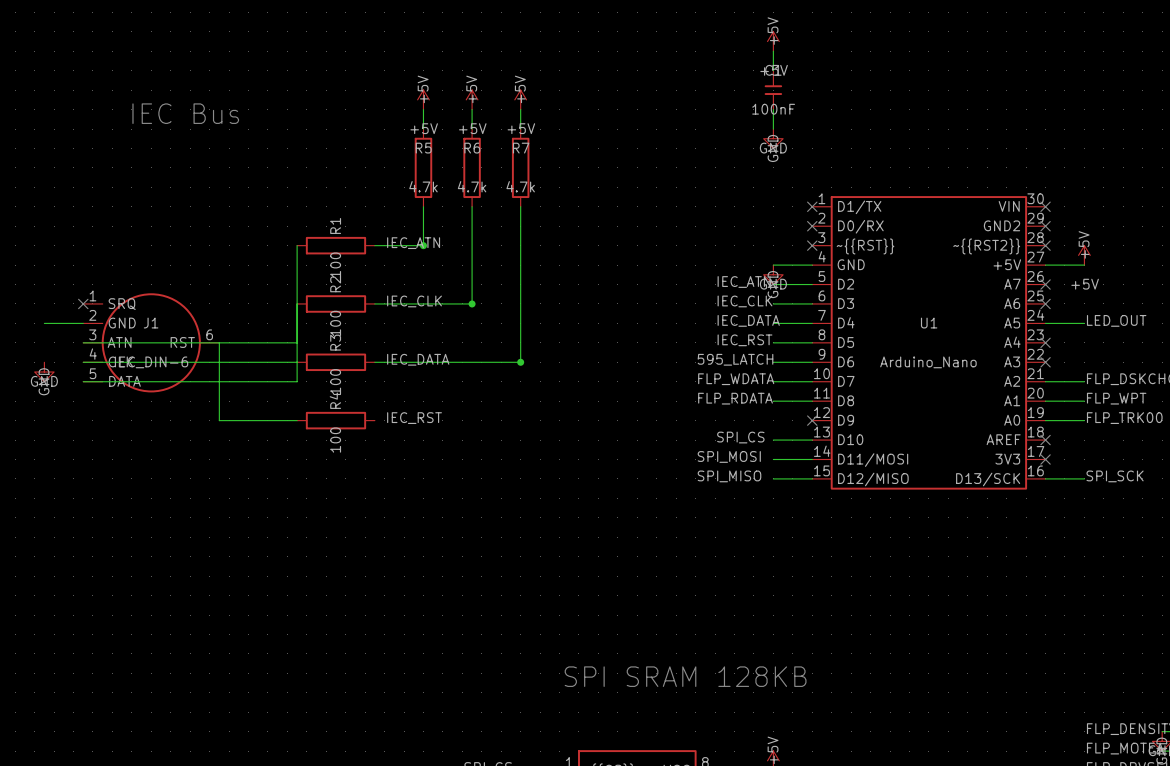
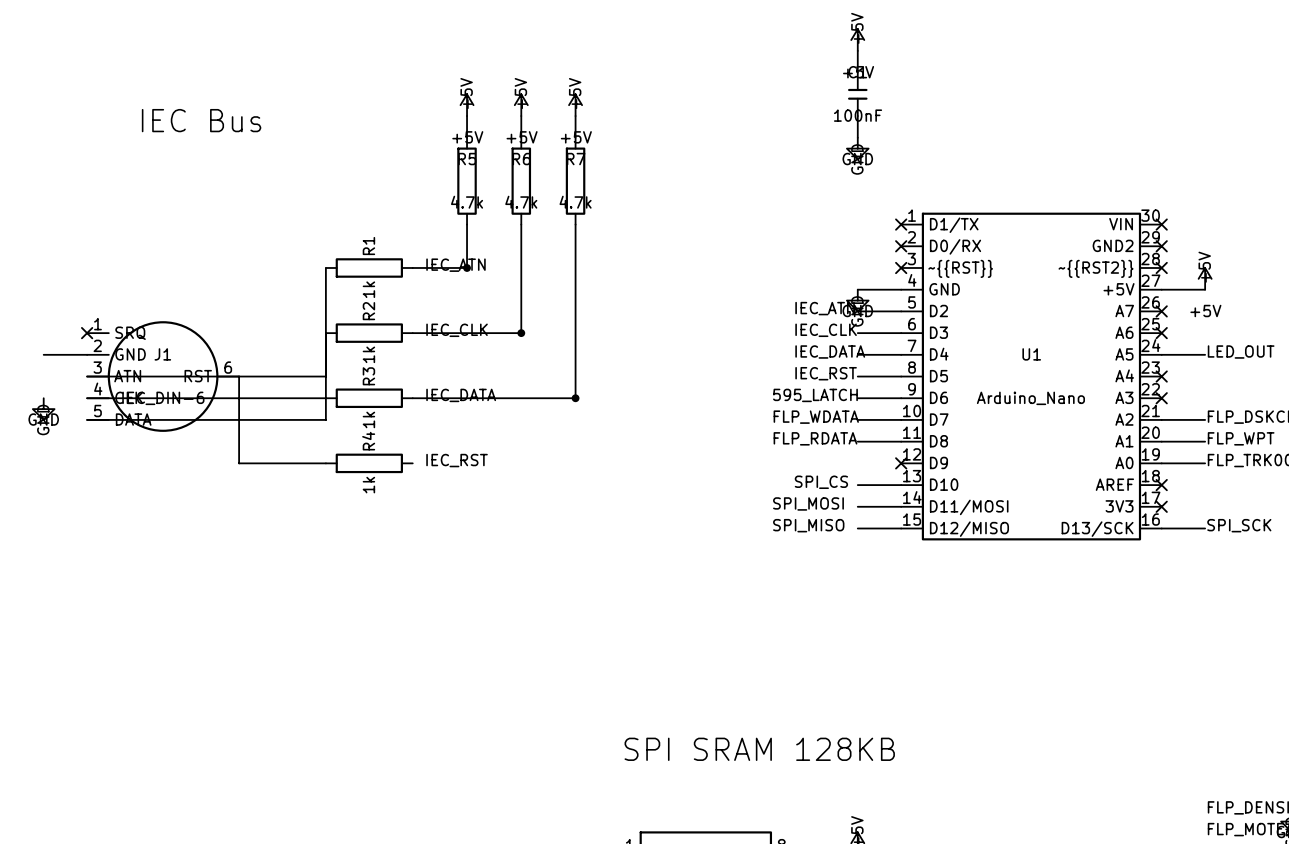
R1 value: 100 (335, 265) -> 1k (368, 289)
R2 value: 100 (335, 323) -> 1k (368, 354)
R3 value: 100 (335, 381) -> 1k (368, 419)
R4 value: 100 (335, 440) -> 1k (368, 485)

